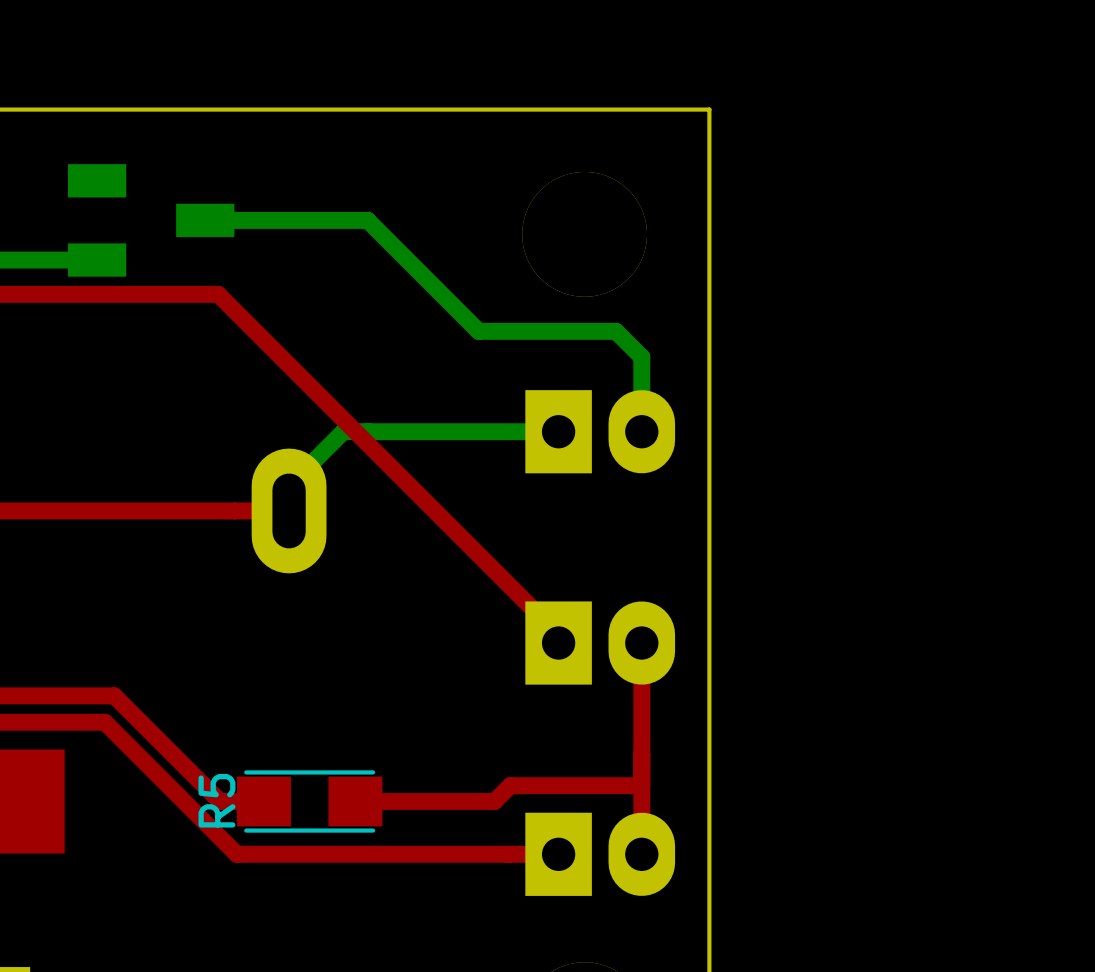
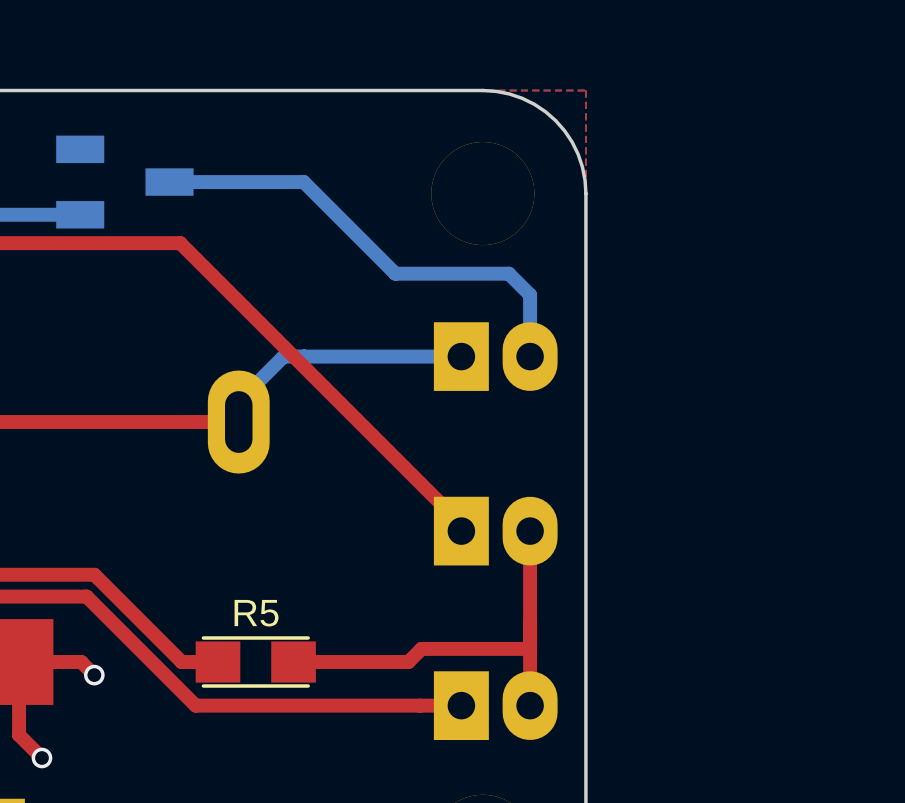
board edge: (584, 109) (709, 109) (709, 234) -> (482, 90) (496, 91) (522, 98) (545, 111) (555, 120) (564, 130) (578, 154) (585, 180) (585, 193)
R5 name rotation: 0° (216, 800) -> 90° clockwise (256, 613)
R5 name position: R5 (216, 800) -> R5 (256, 613)
top track: none -> (94, 675) (81, 662) (19, 662) (19, 735) (41, 757)
via: none -> (94, 675)
via: none -> (41, 757)

